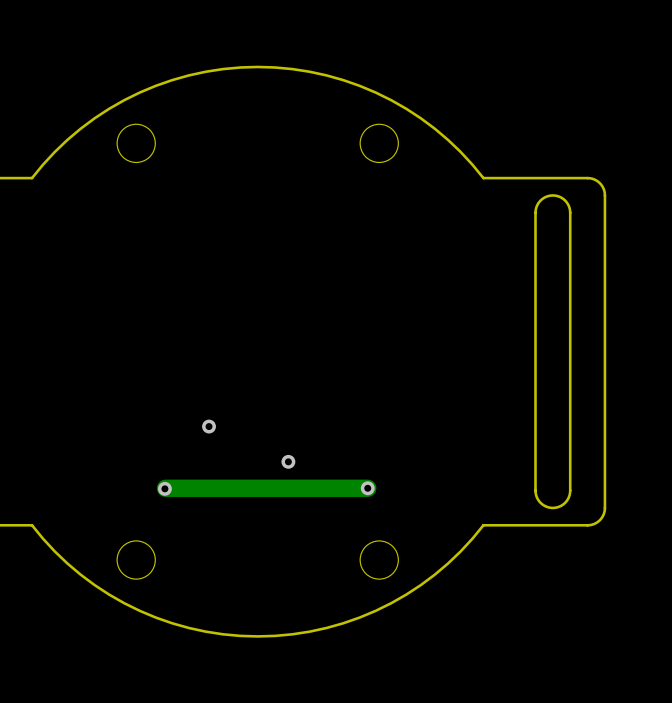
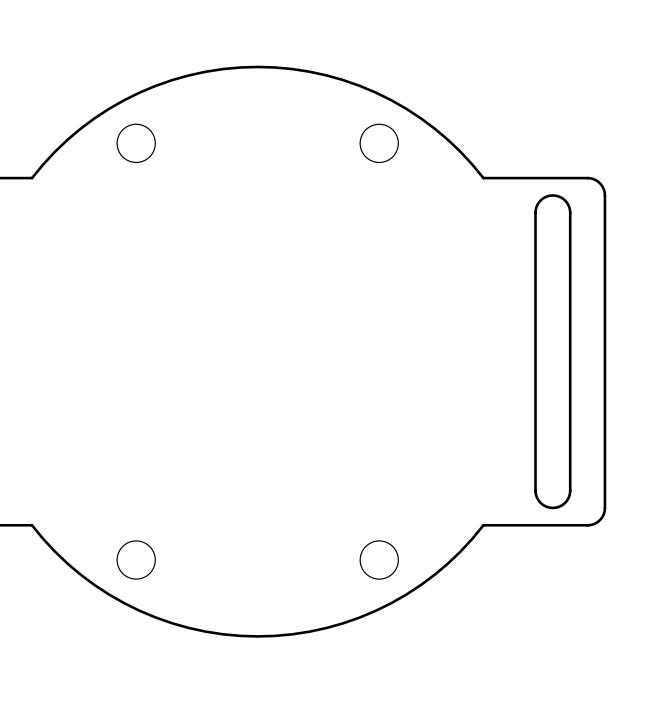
via: (209, 426) -> none
via: (288, 461) -> none
via: (164, 488) -> none
track: (367, 488) (164, 488) -> none
via: (367, 488) -> none

